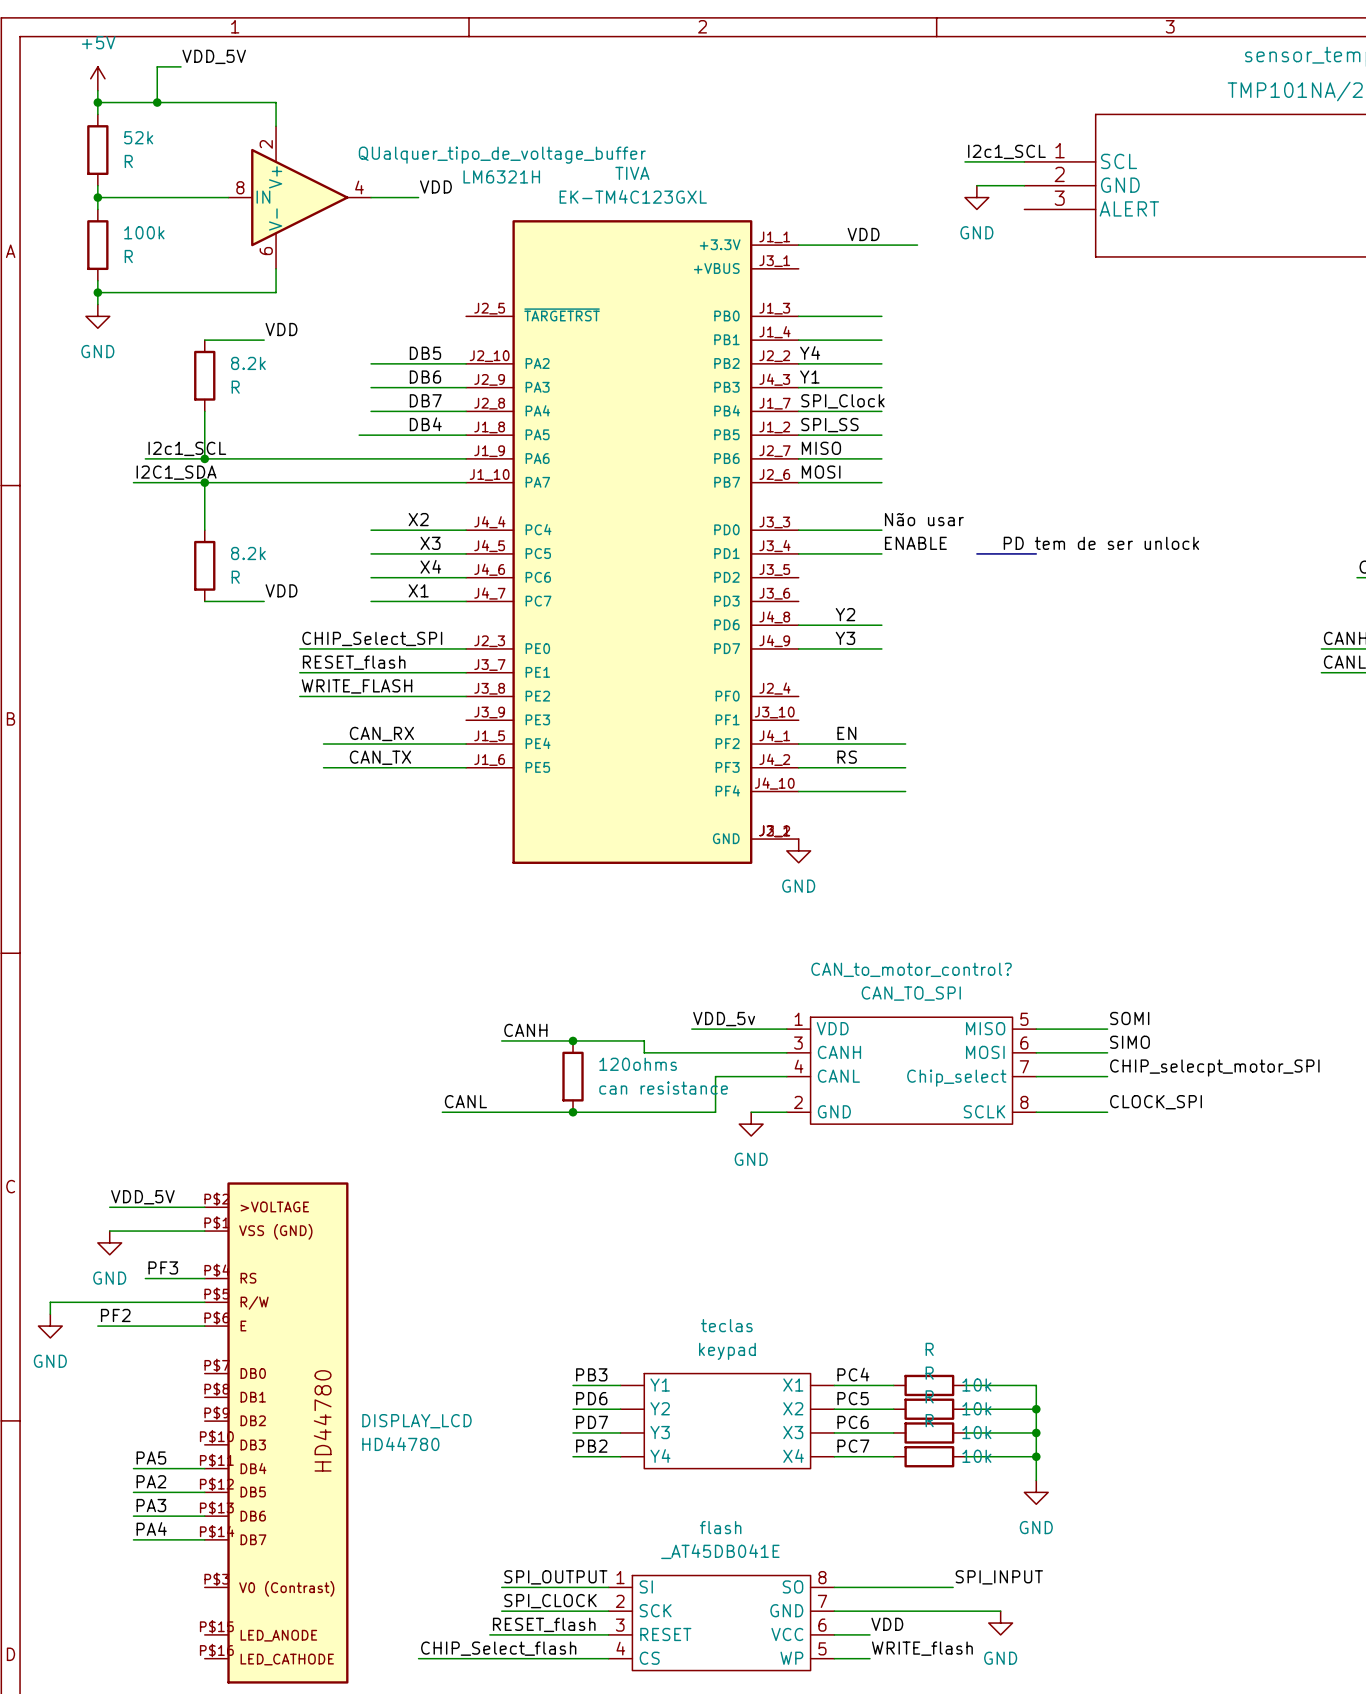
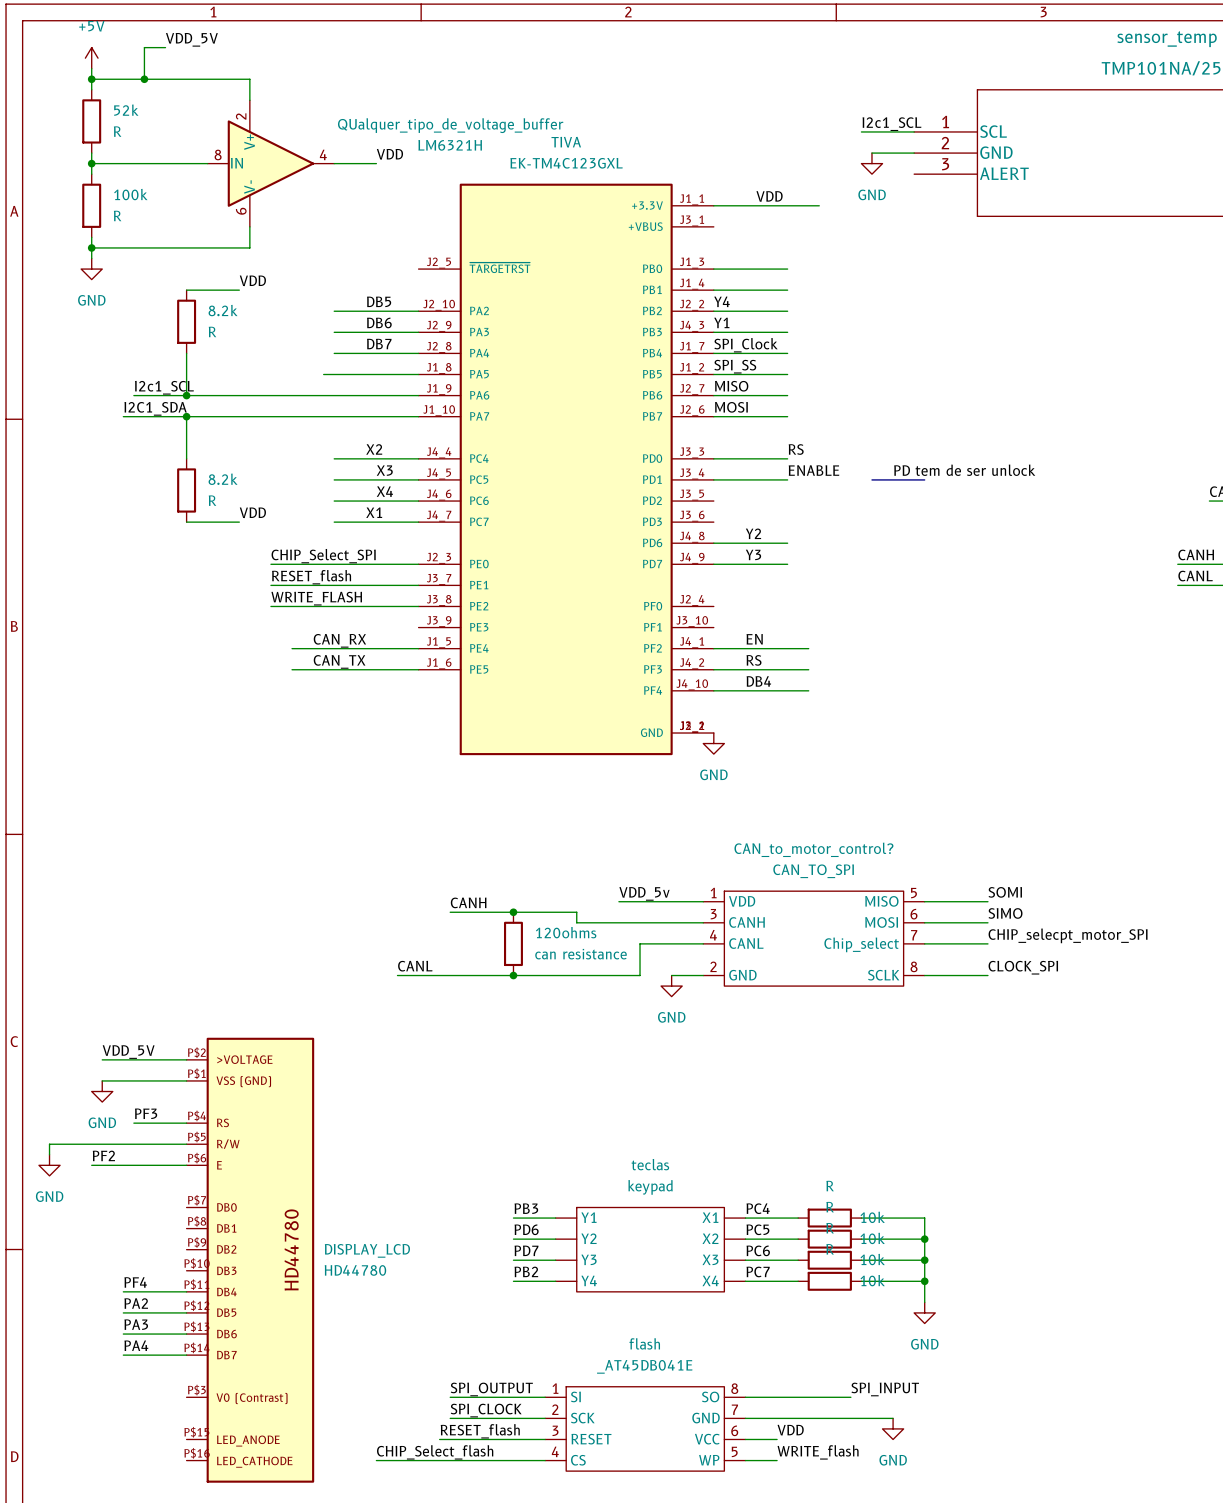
label: DB4 (425, 424) -> none
label: Não usar (924, 519) -> RS (796, 449)
label: none -> DB4 (758, 681)
label: PA5 (151, 1458) -> PF4 (135, 1282)

